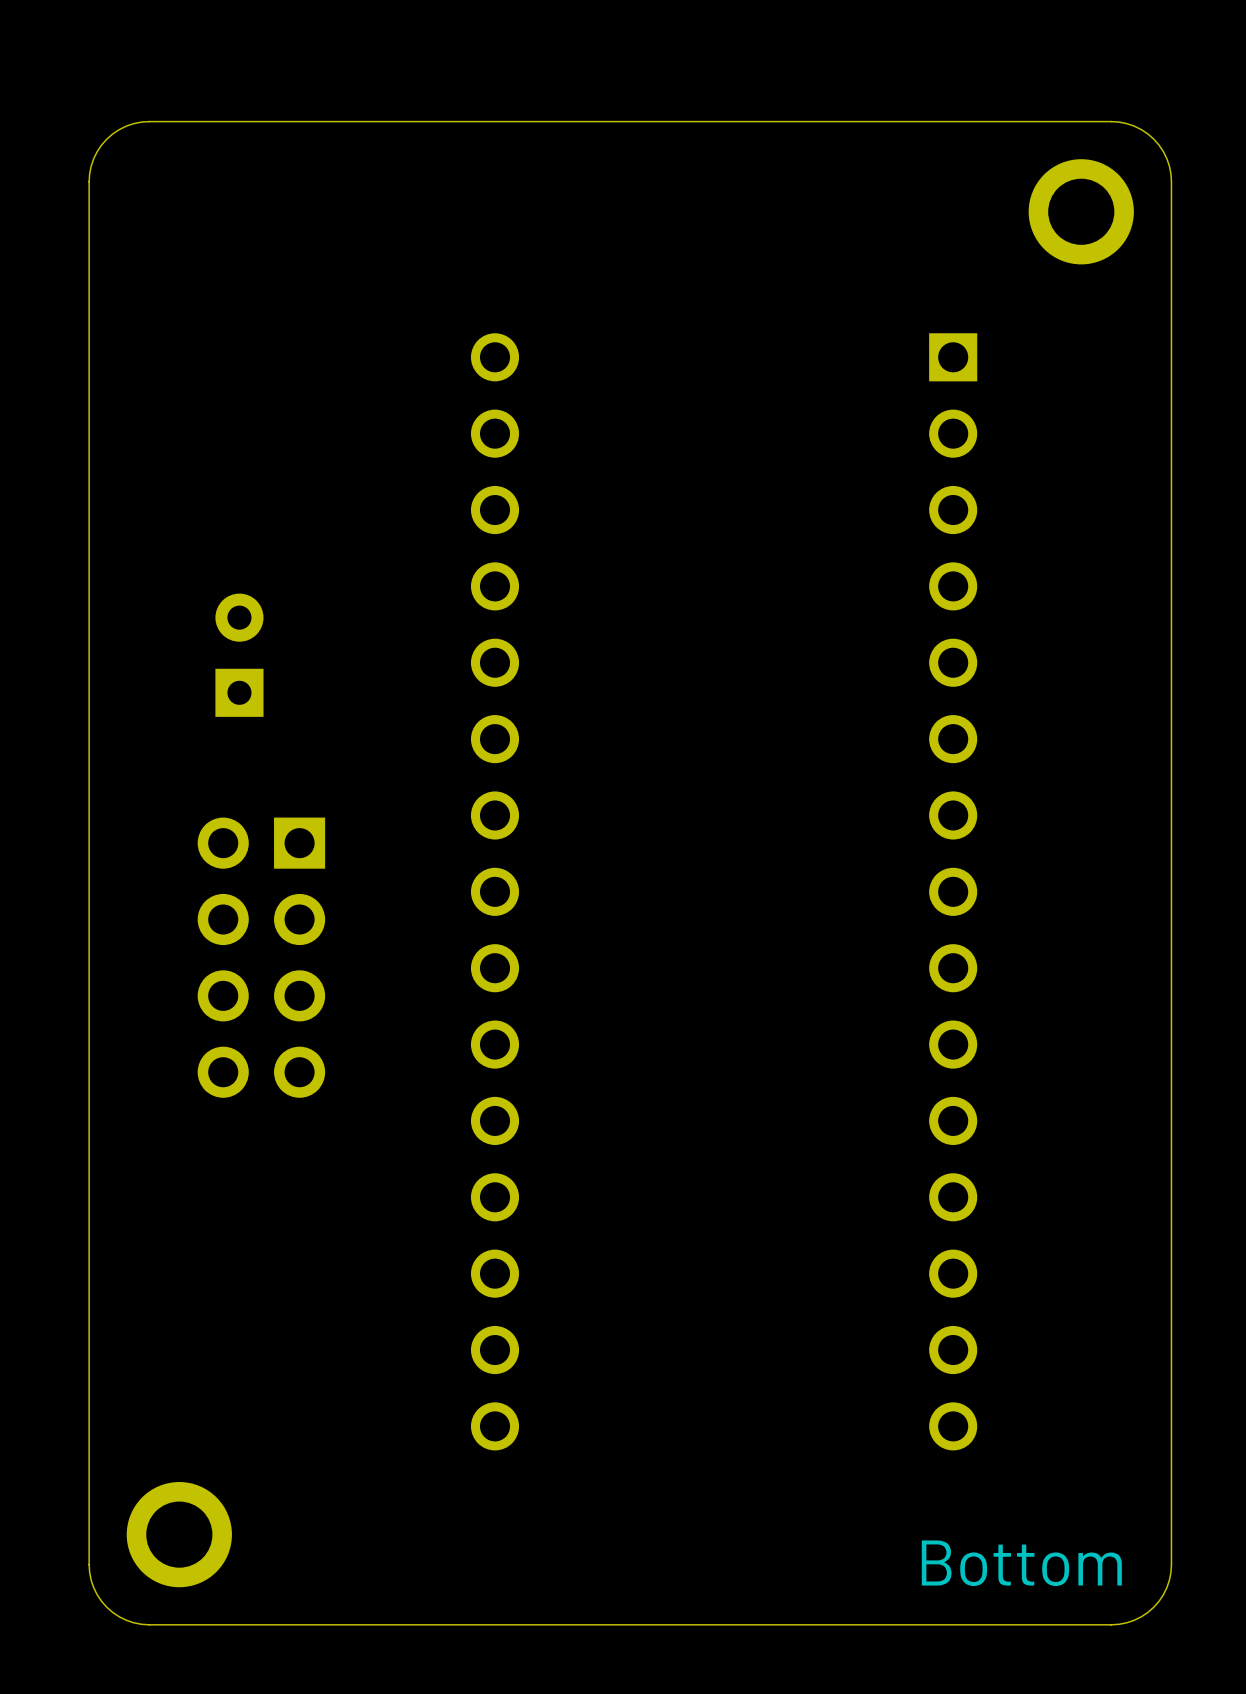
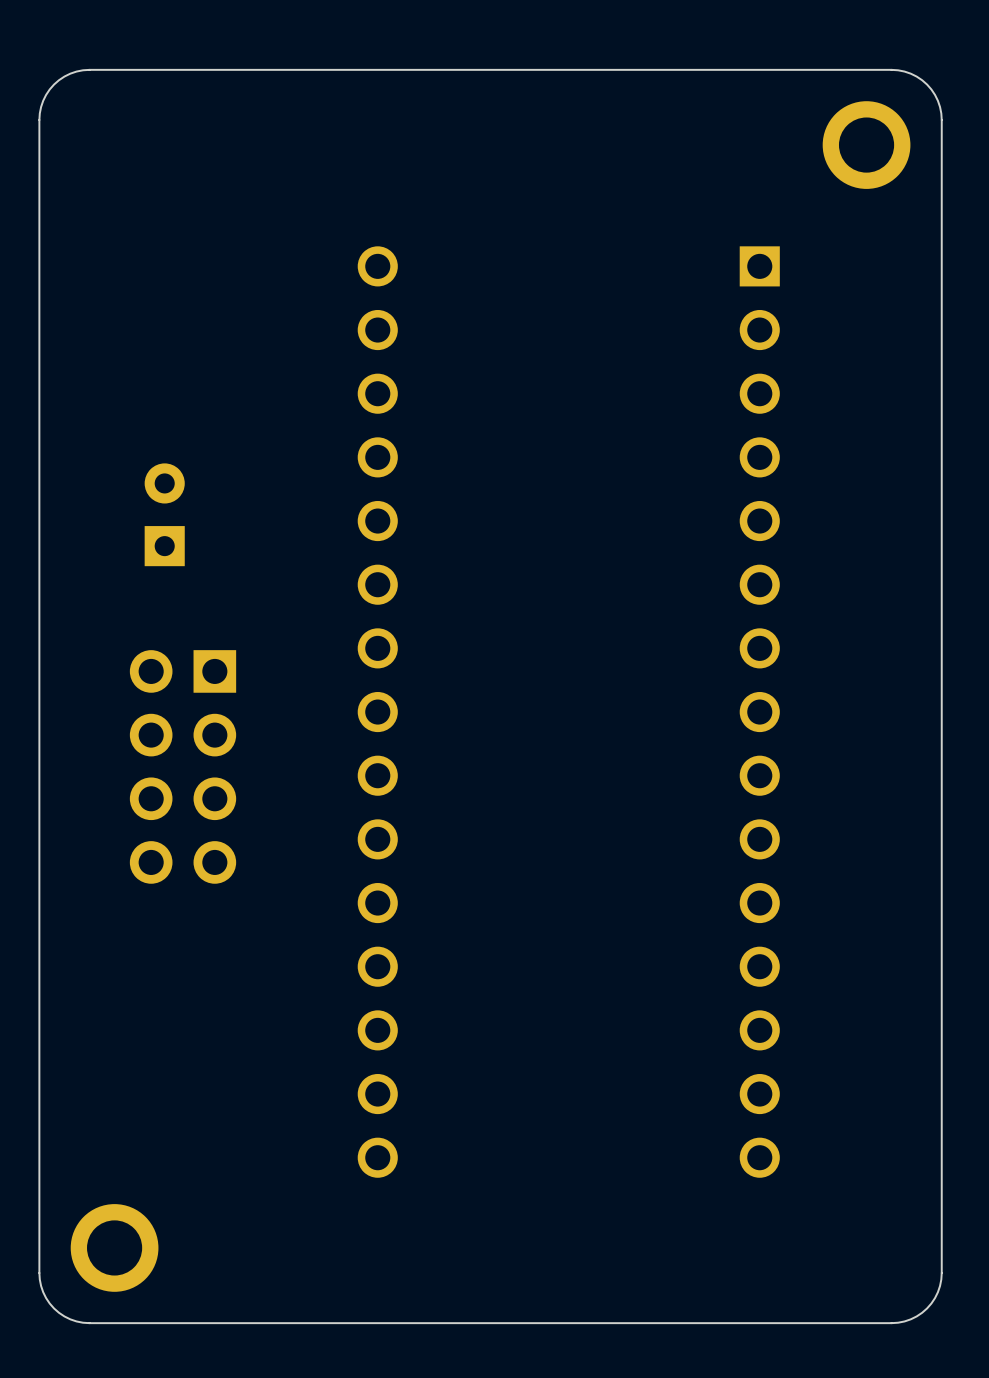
text: Bottom (1021, 1563) -> none

